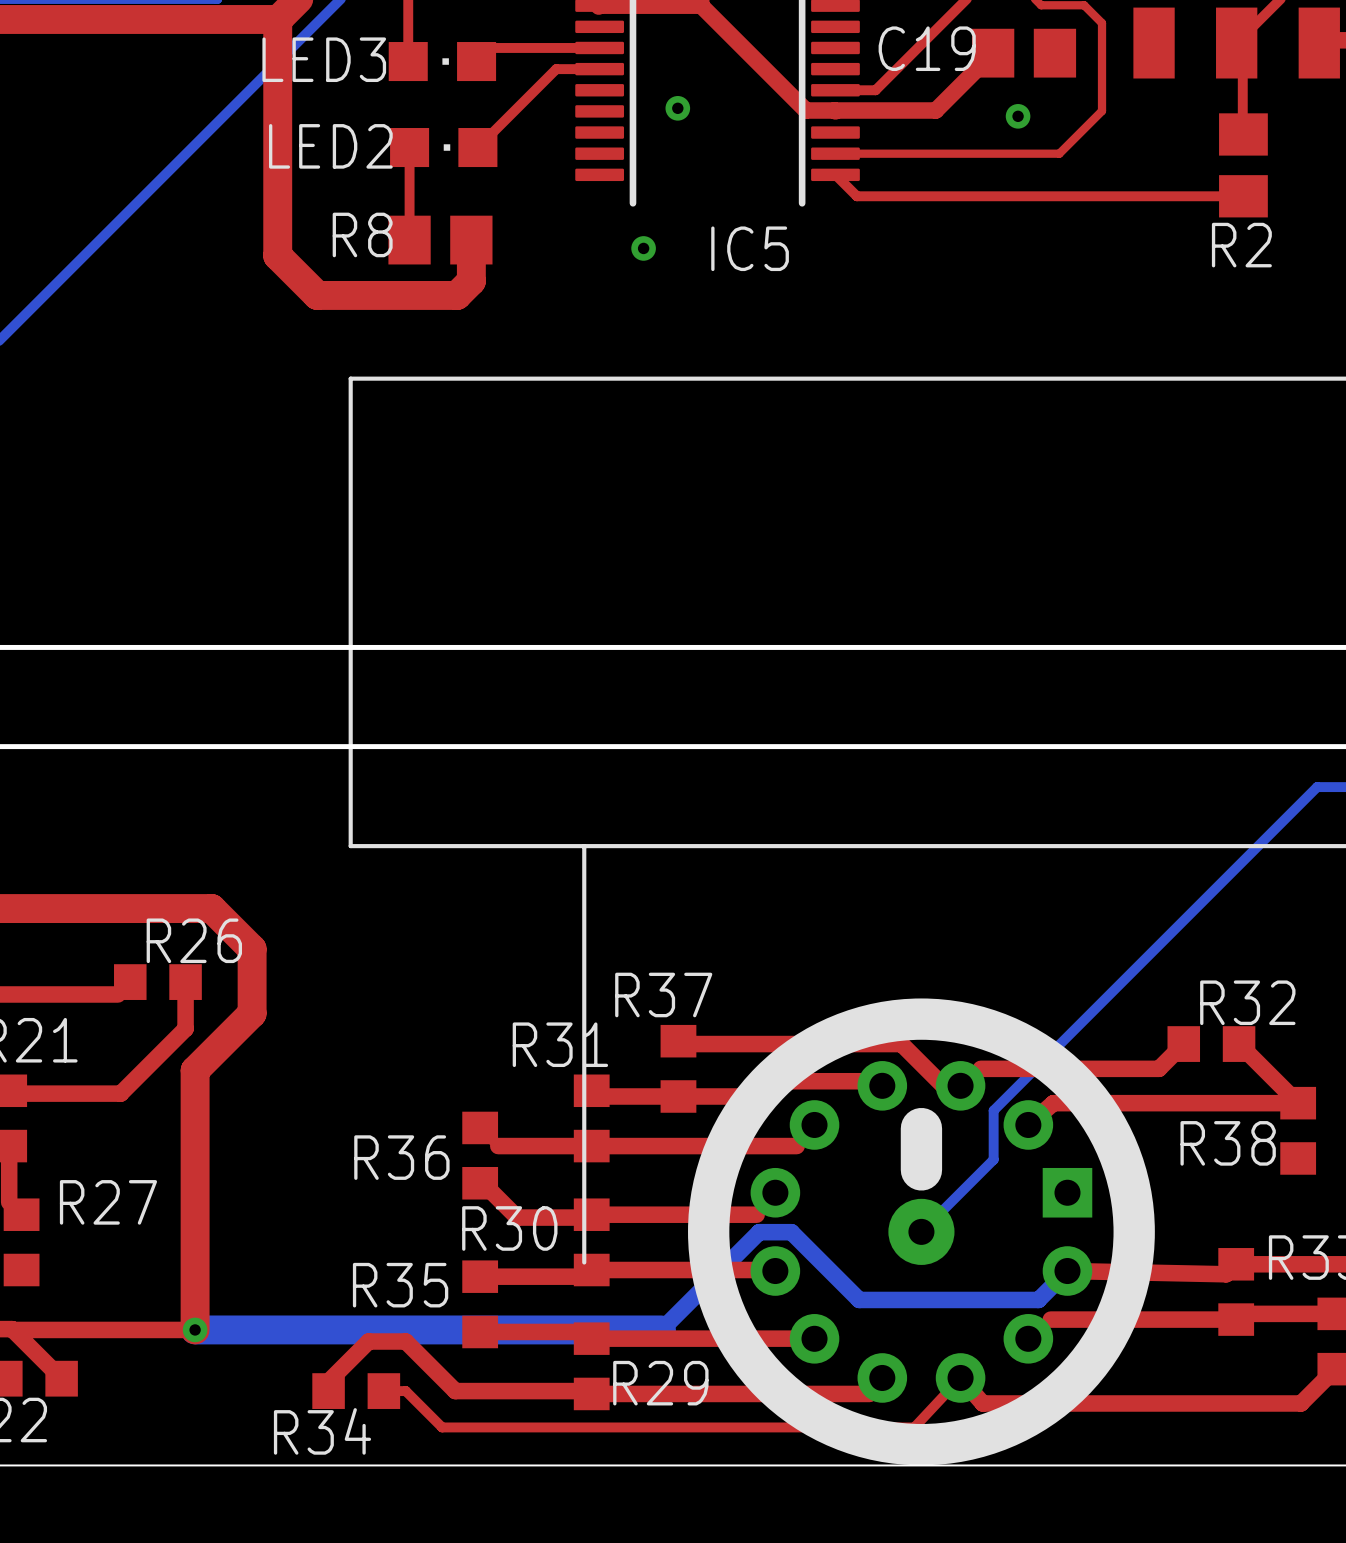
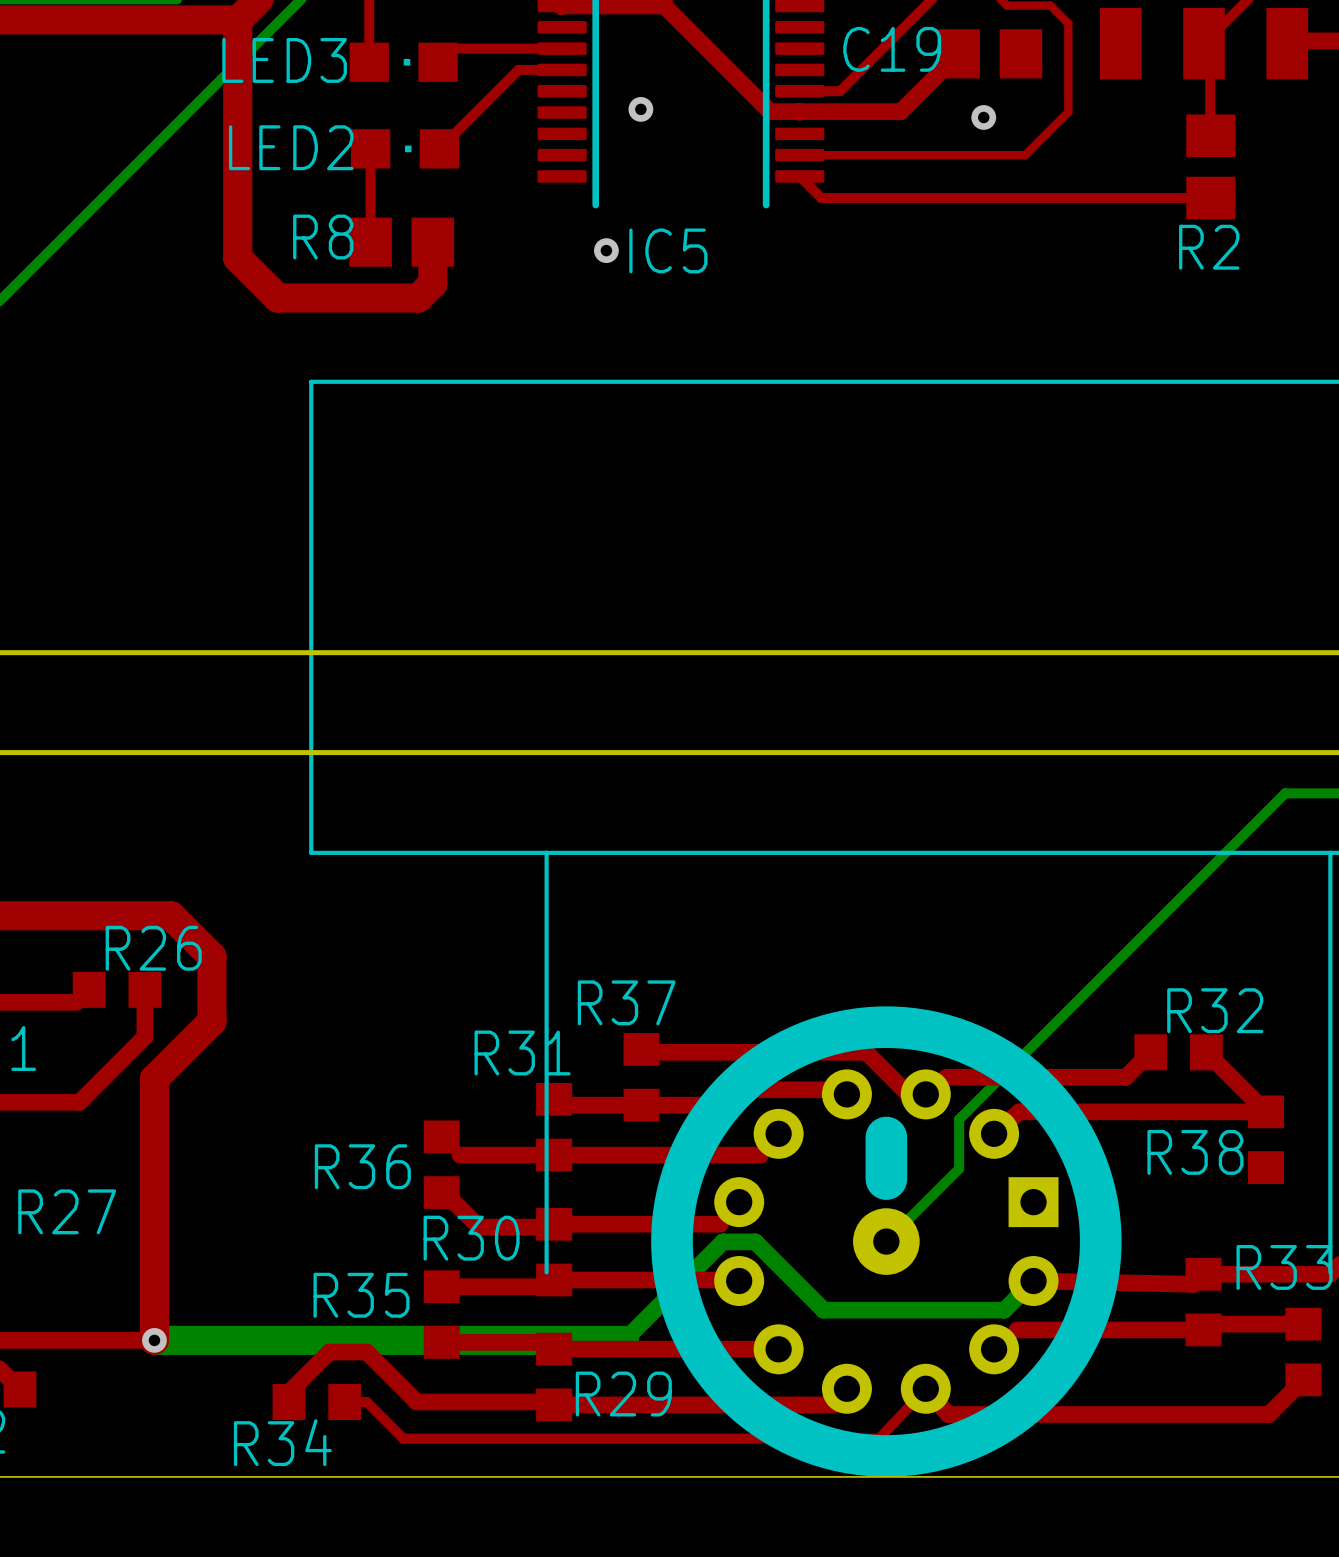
IC5 name position: IC5 (750, 248) -> IC5 (668, 250)

